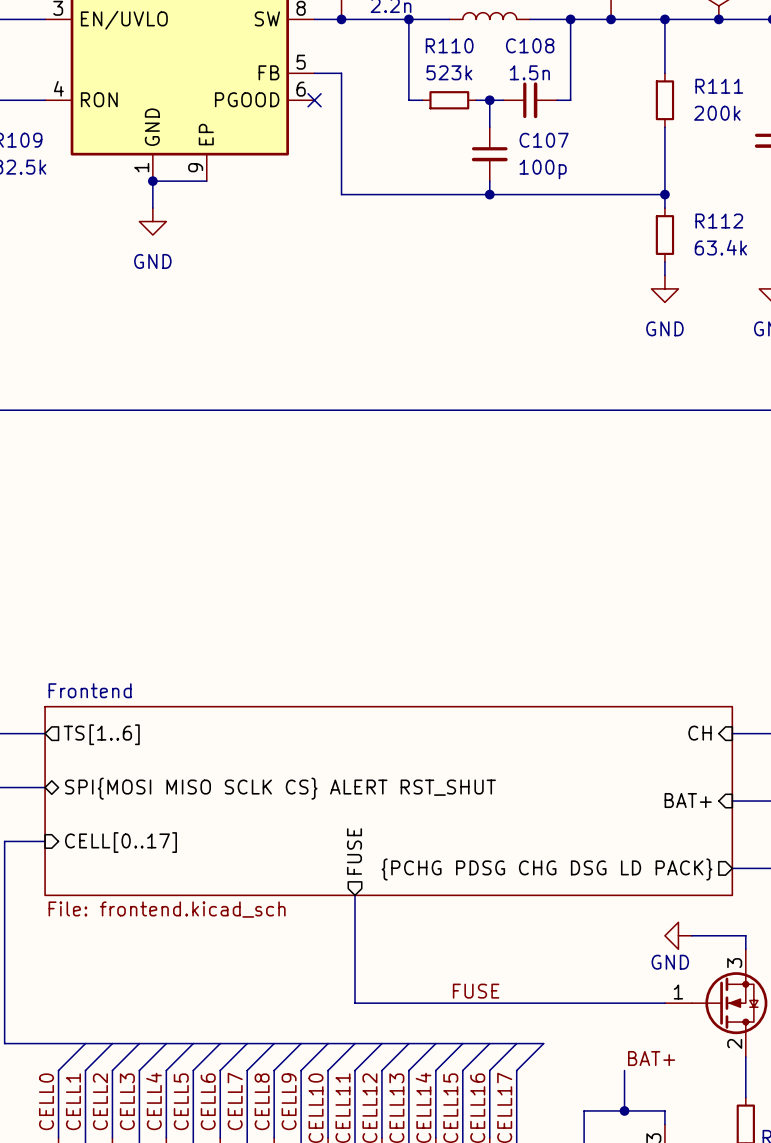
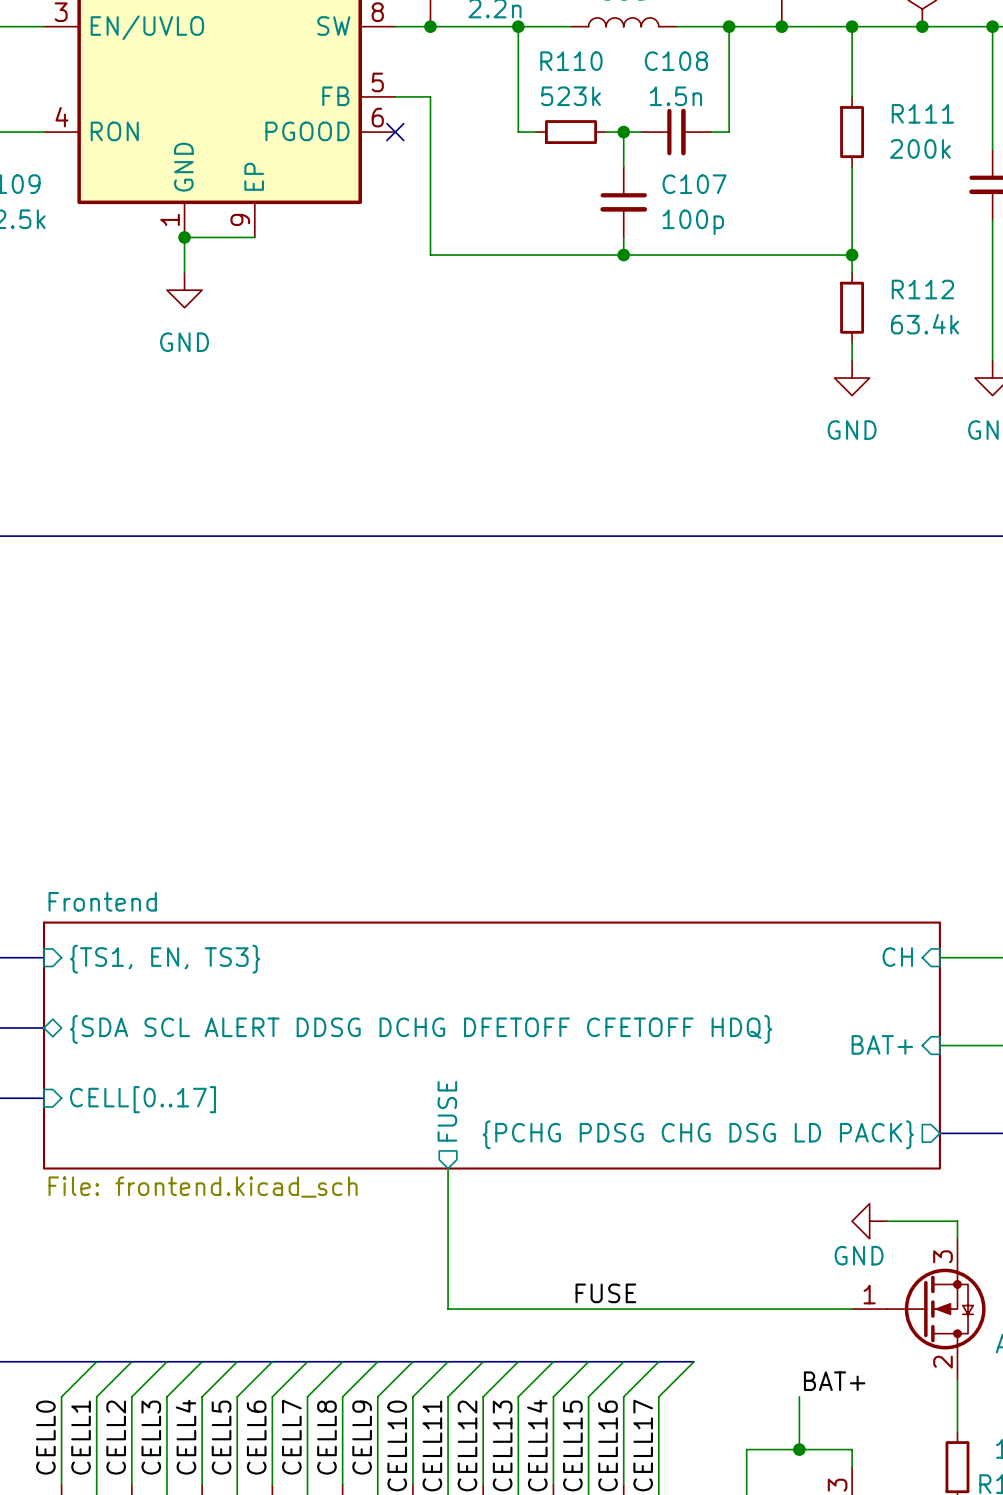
sheet pin shape: output (101, 734) -> input (165, 959)
sheet pin: TS[1..6] (101, 734) -> {TS1, EN, TS3} (165, 959)
sheet pin: SPI{MOSI MISO SCLK CS} ALERT RST_SHUT (280, 788) -> {SDA SCL ALERT DDSG DCHG DFETOFF CFETOFF HDQ} (421, 1029)

